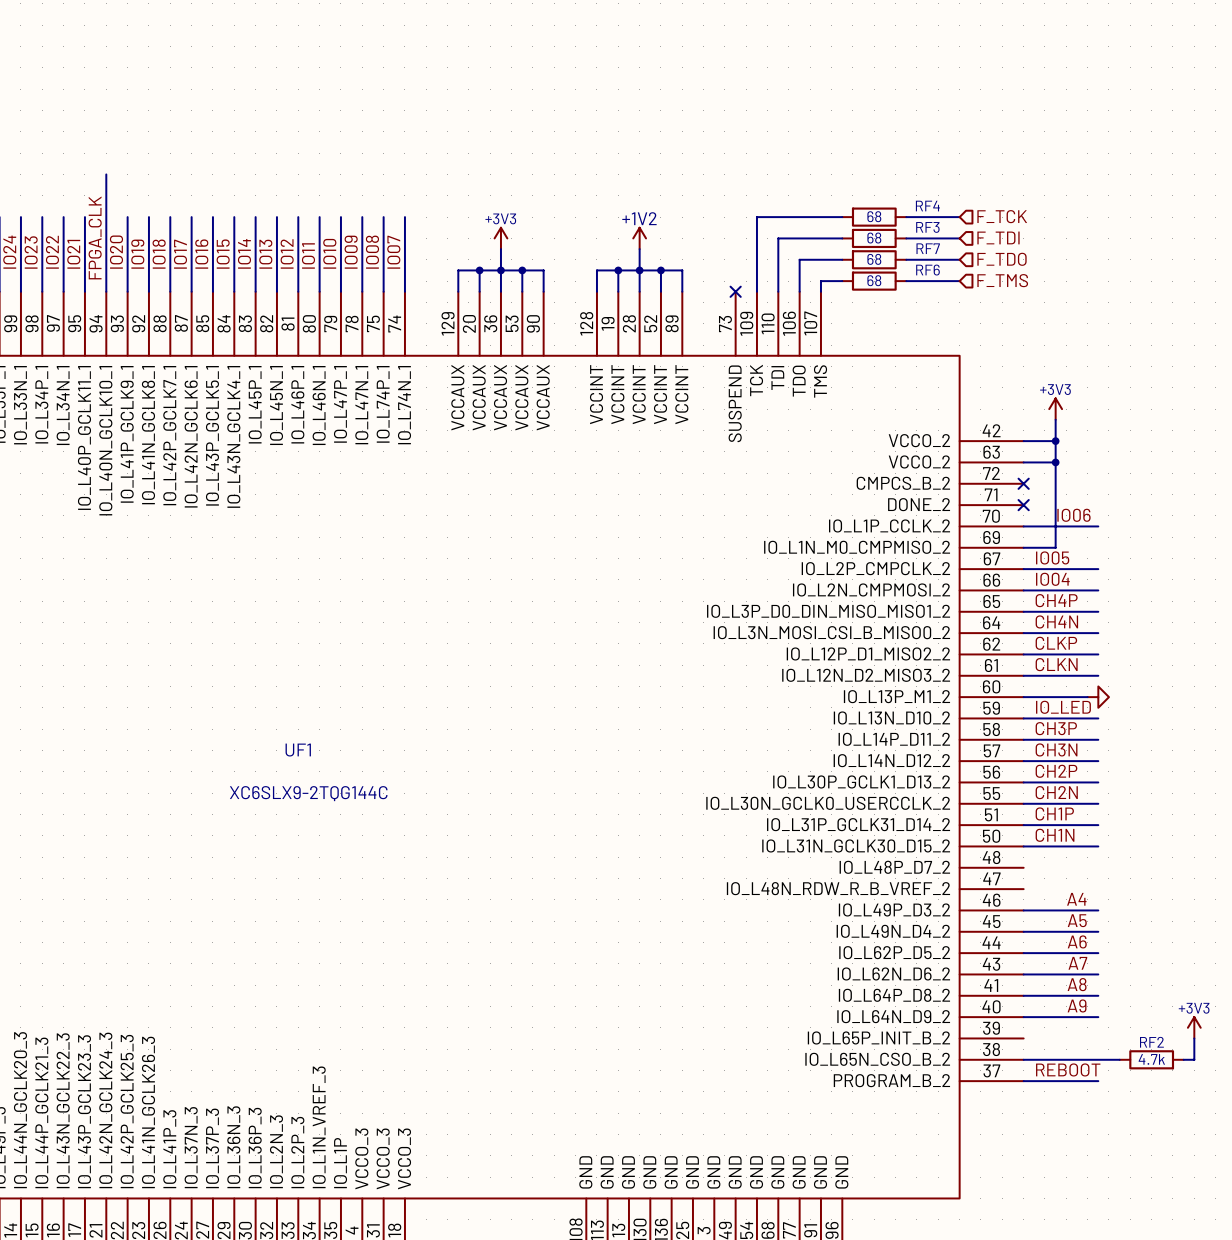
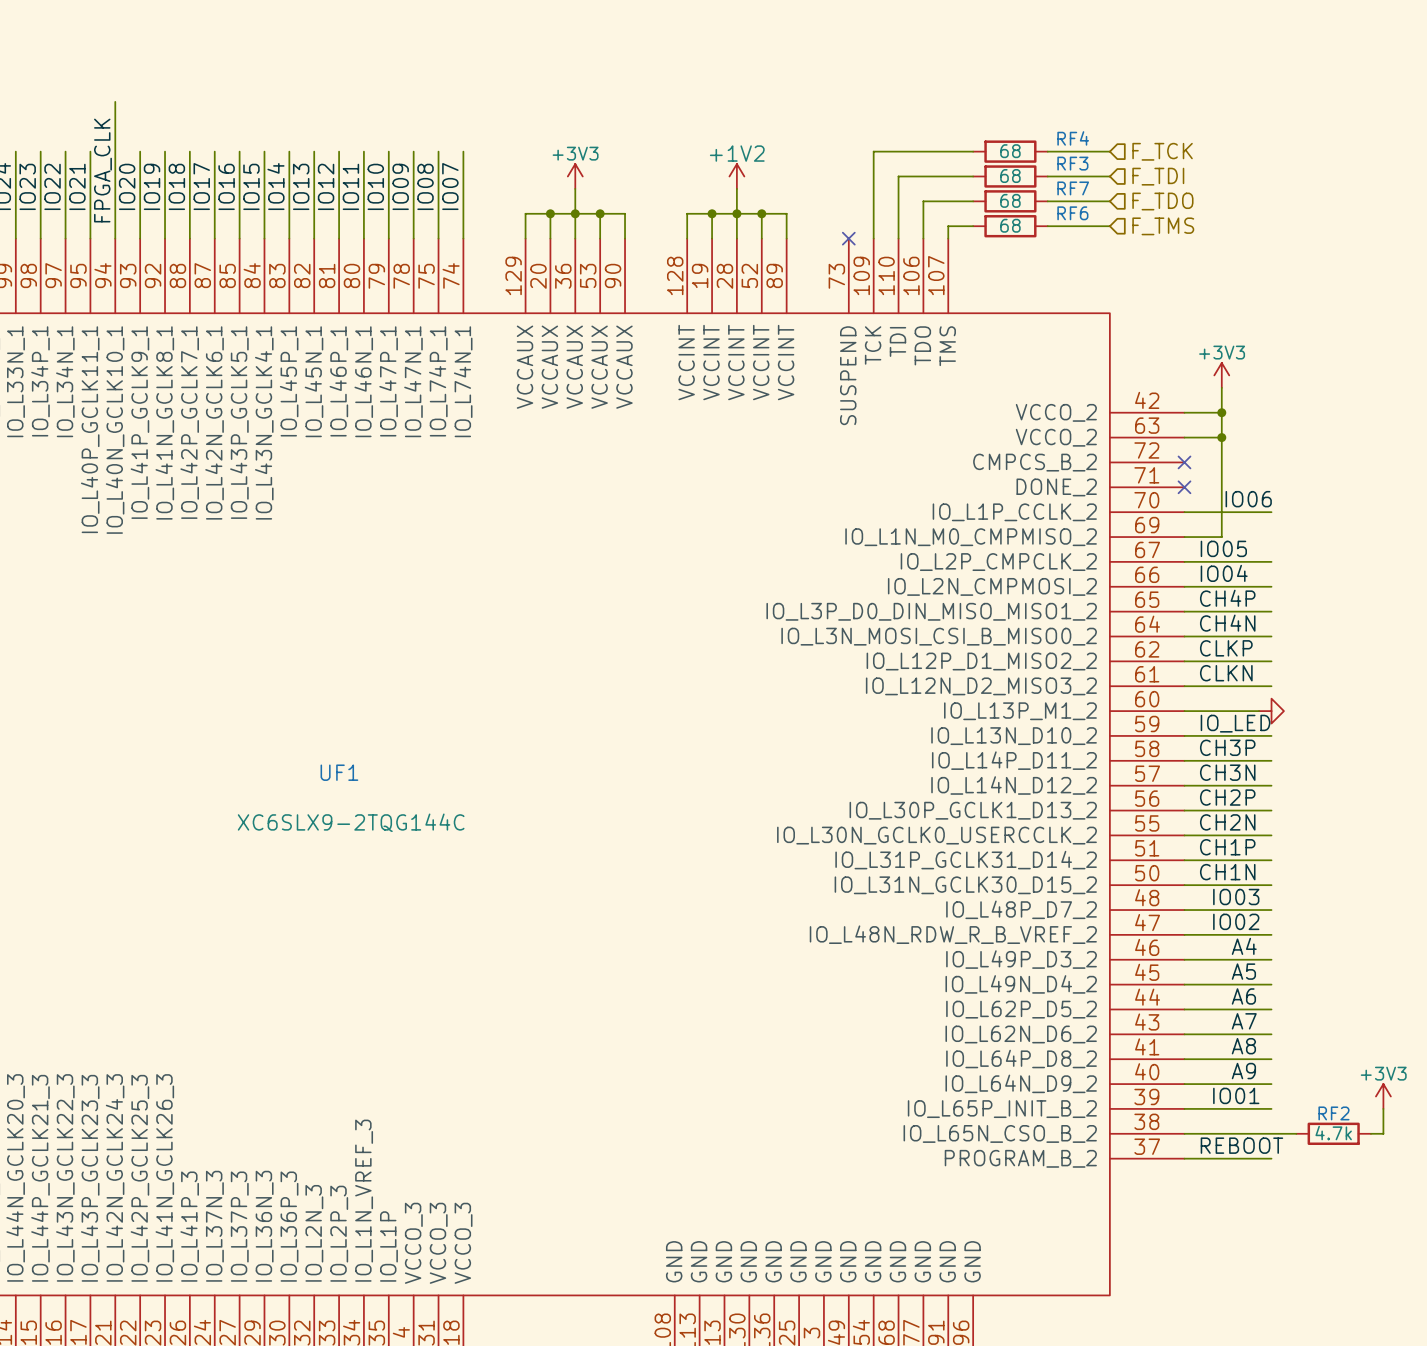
label: none -> IO03 (1236, 897)
wire: none -> (1184, 910) (1271, 910)
label: none -> IO02 (1236, 921)
wire: none -> (1184, 934) (1271, 934)
label: none -> IO01 (1236, 1095)
wire: none -> (1184, 1108) (1271, 1108)

